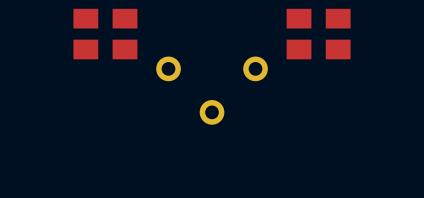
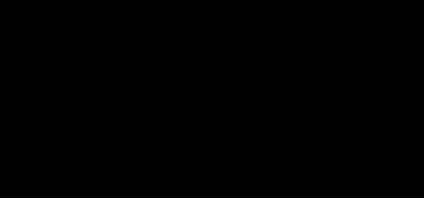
part: (85, 34) -> none
part: (125, 34) -> none
part: (299, 34) -> none
part: (338, 34) -> none
part: (212, 90) -> none

